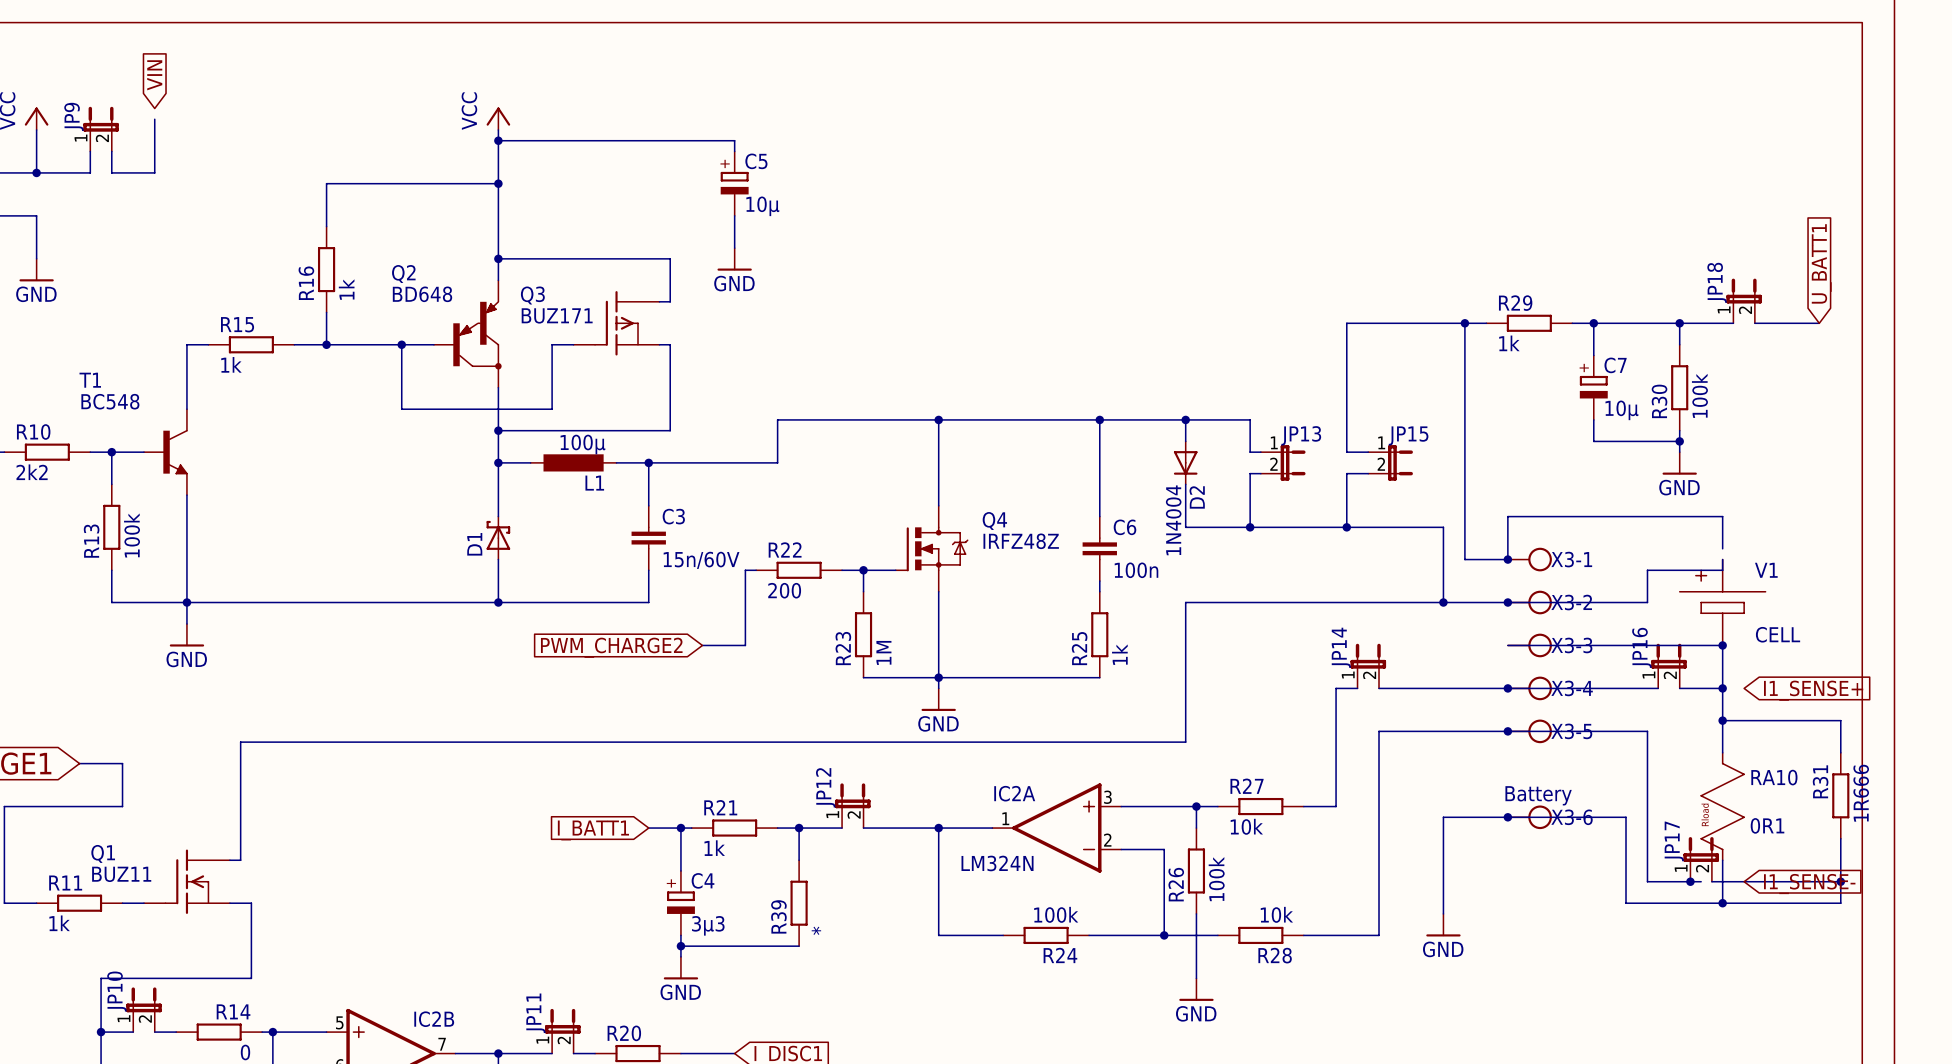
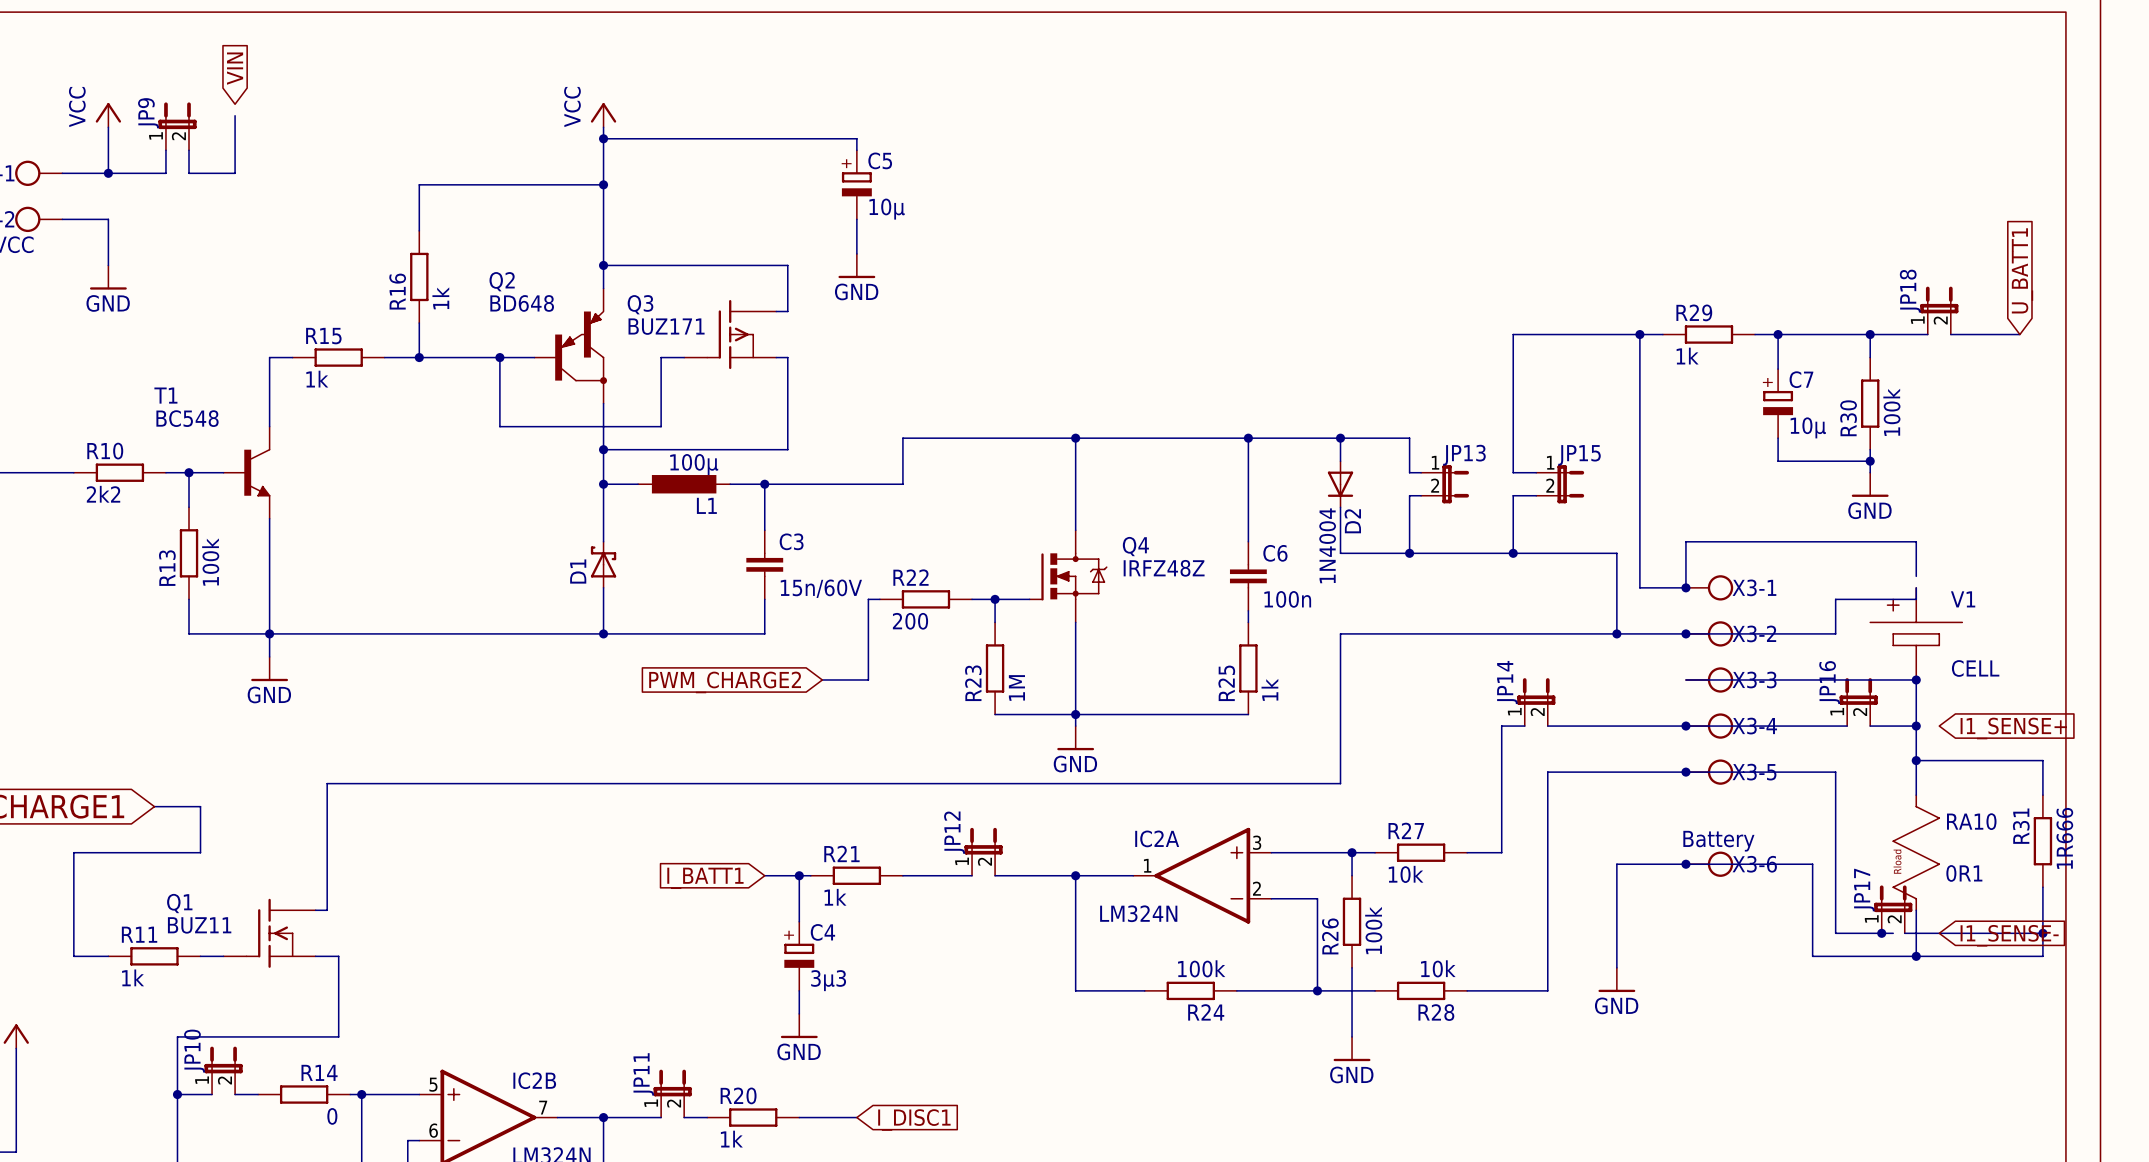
wire: (799, 828) (799, 860) -> none
junction: (799, 828) -> none
R39: * (799, 903) -> none
wire: (680, 946) (799, 946) -> none
junction: (680, 946) -> none

